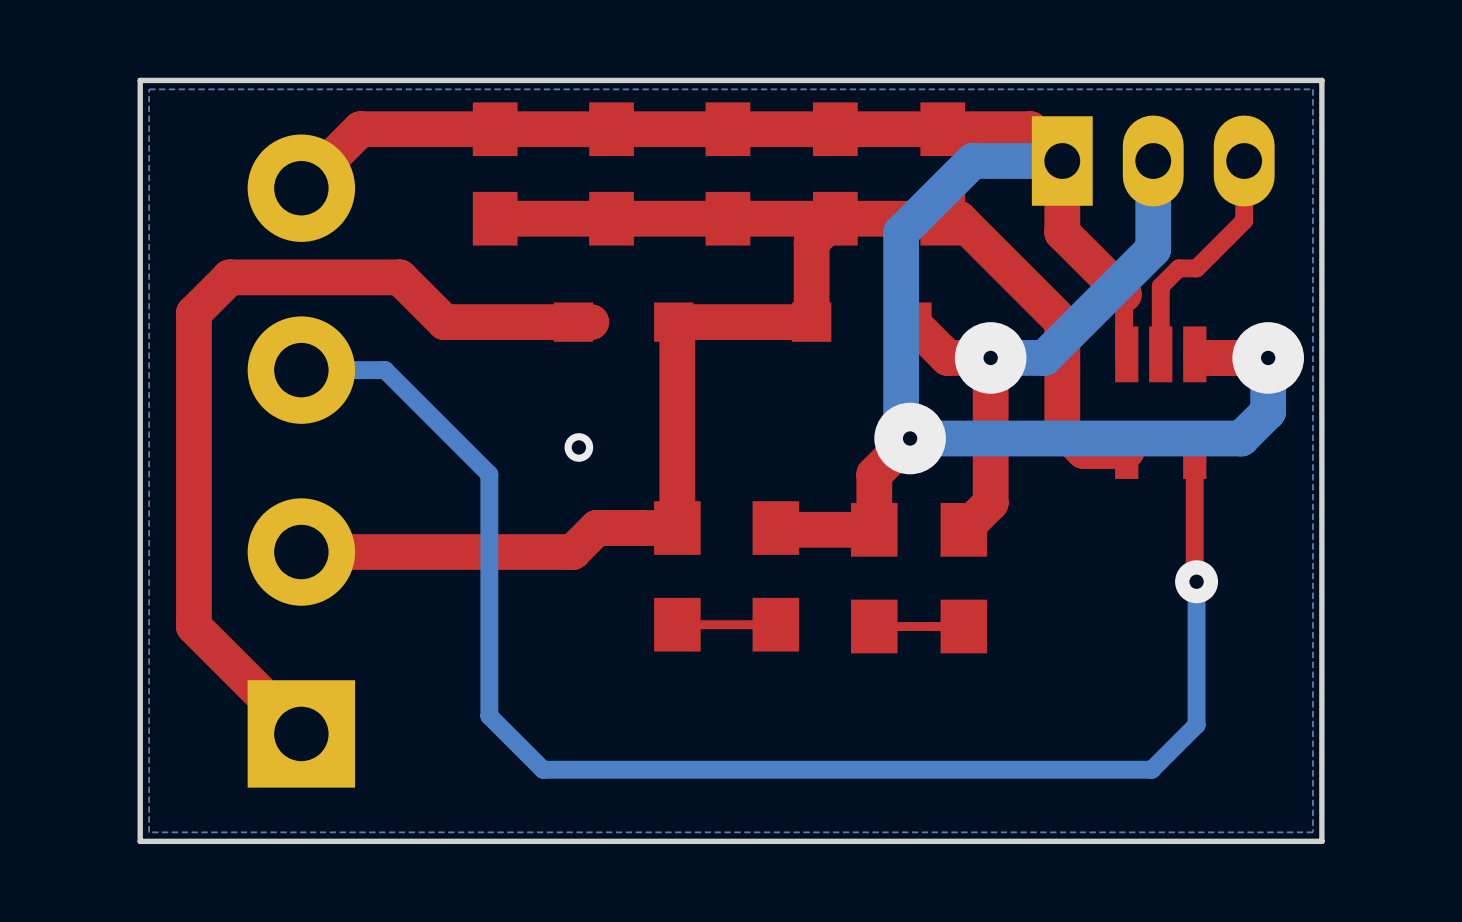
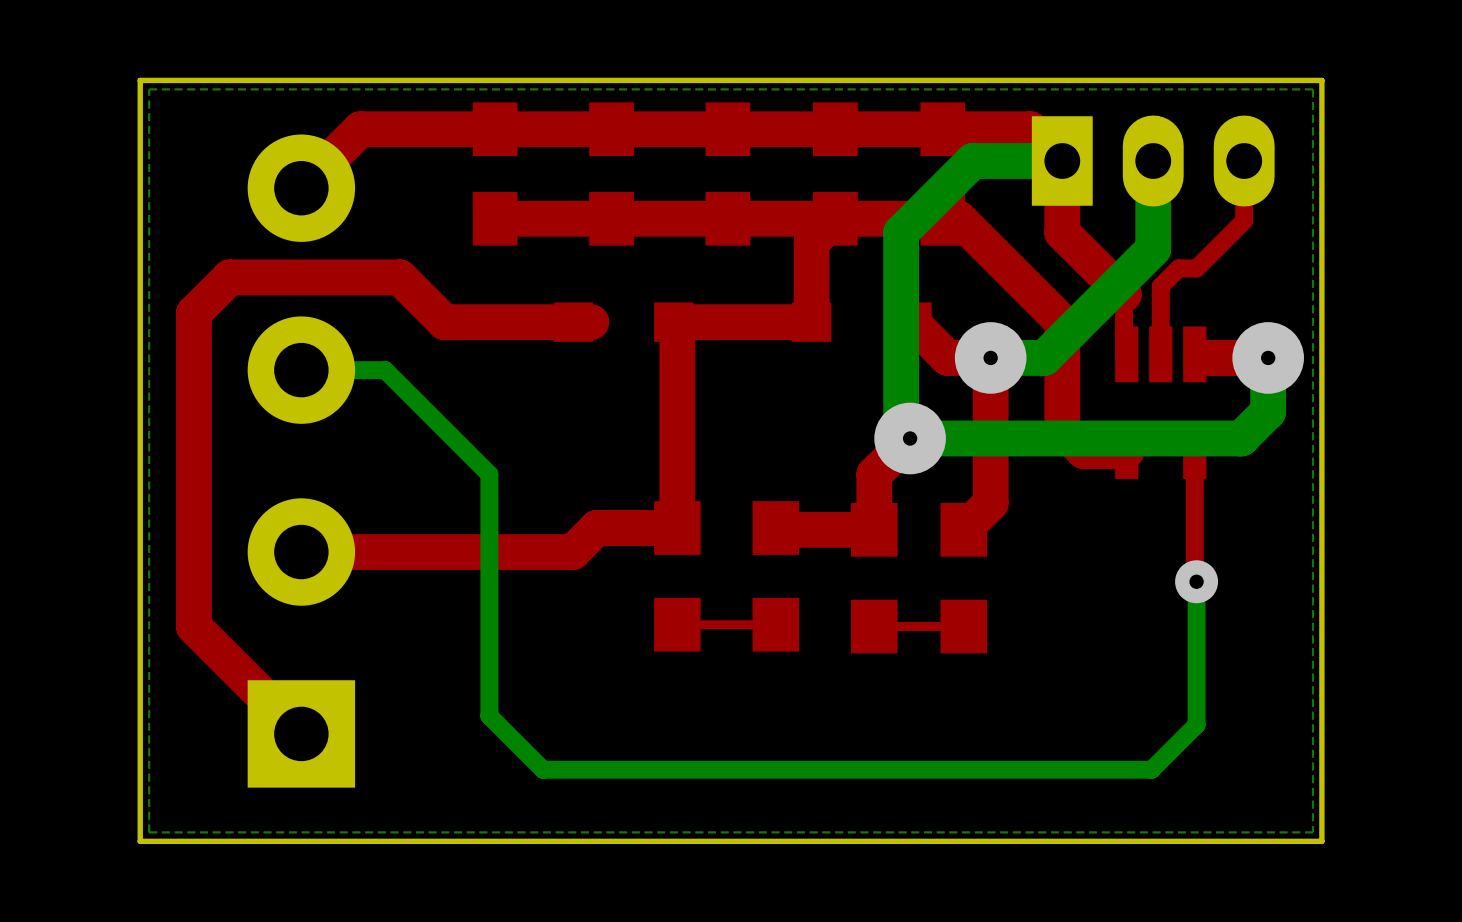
via: (578, 447) -> none

